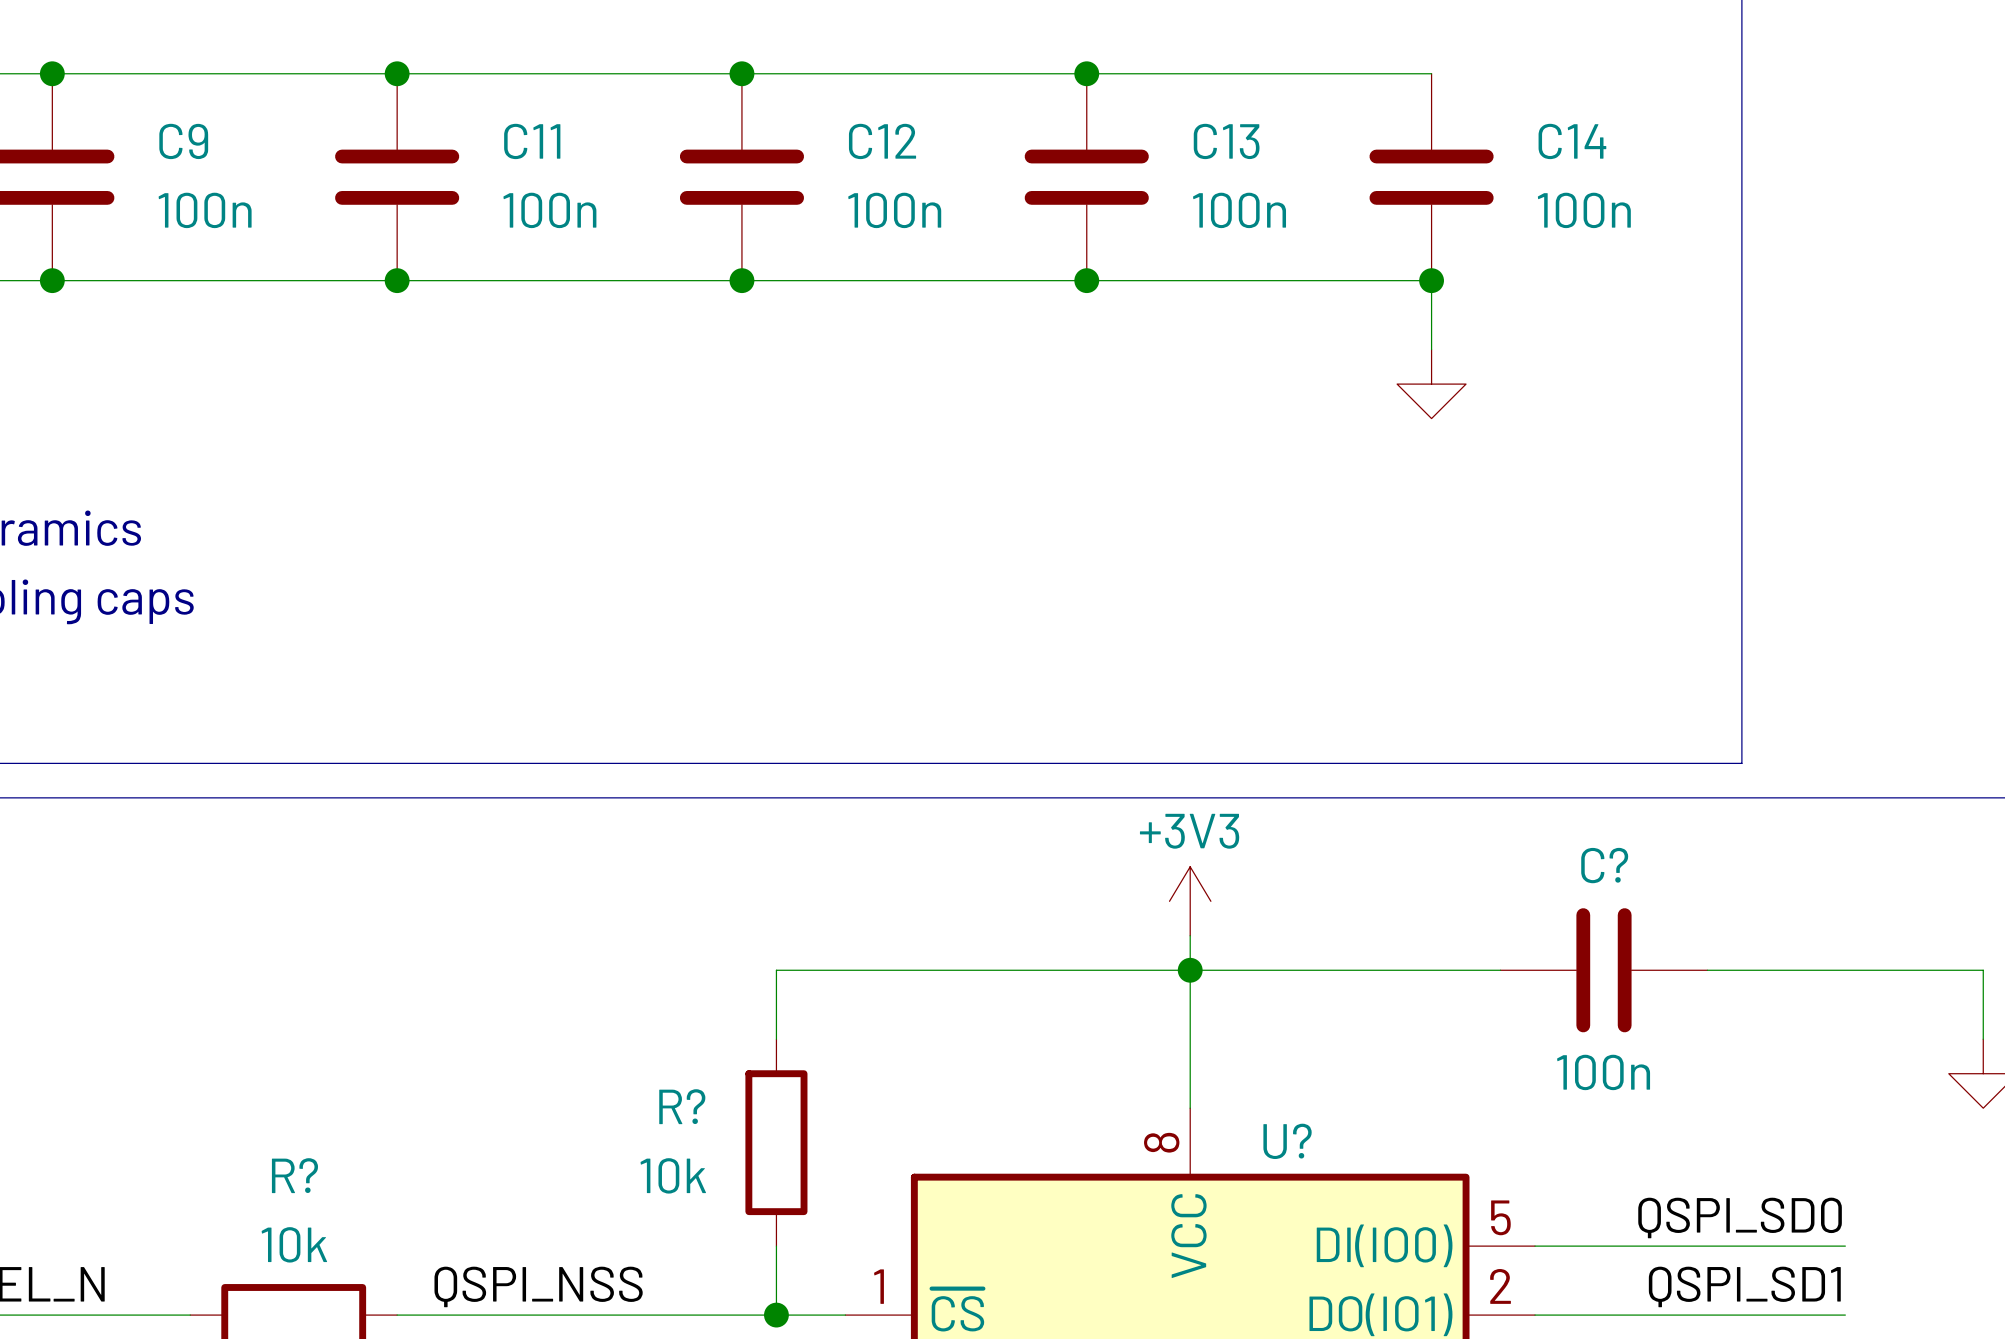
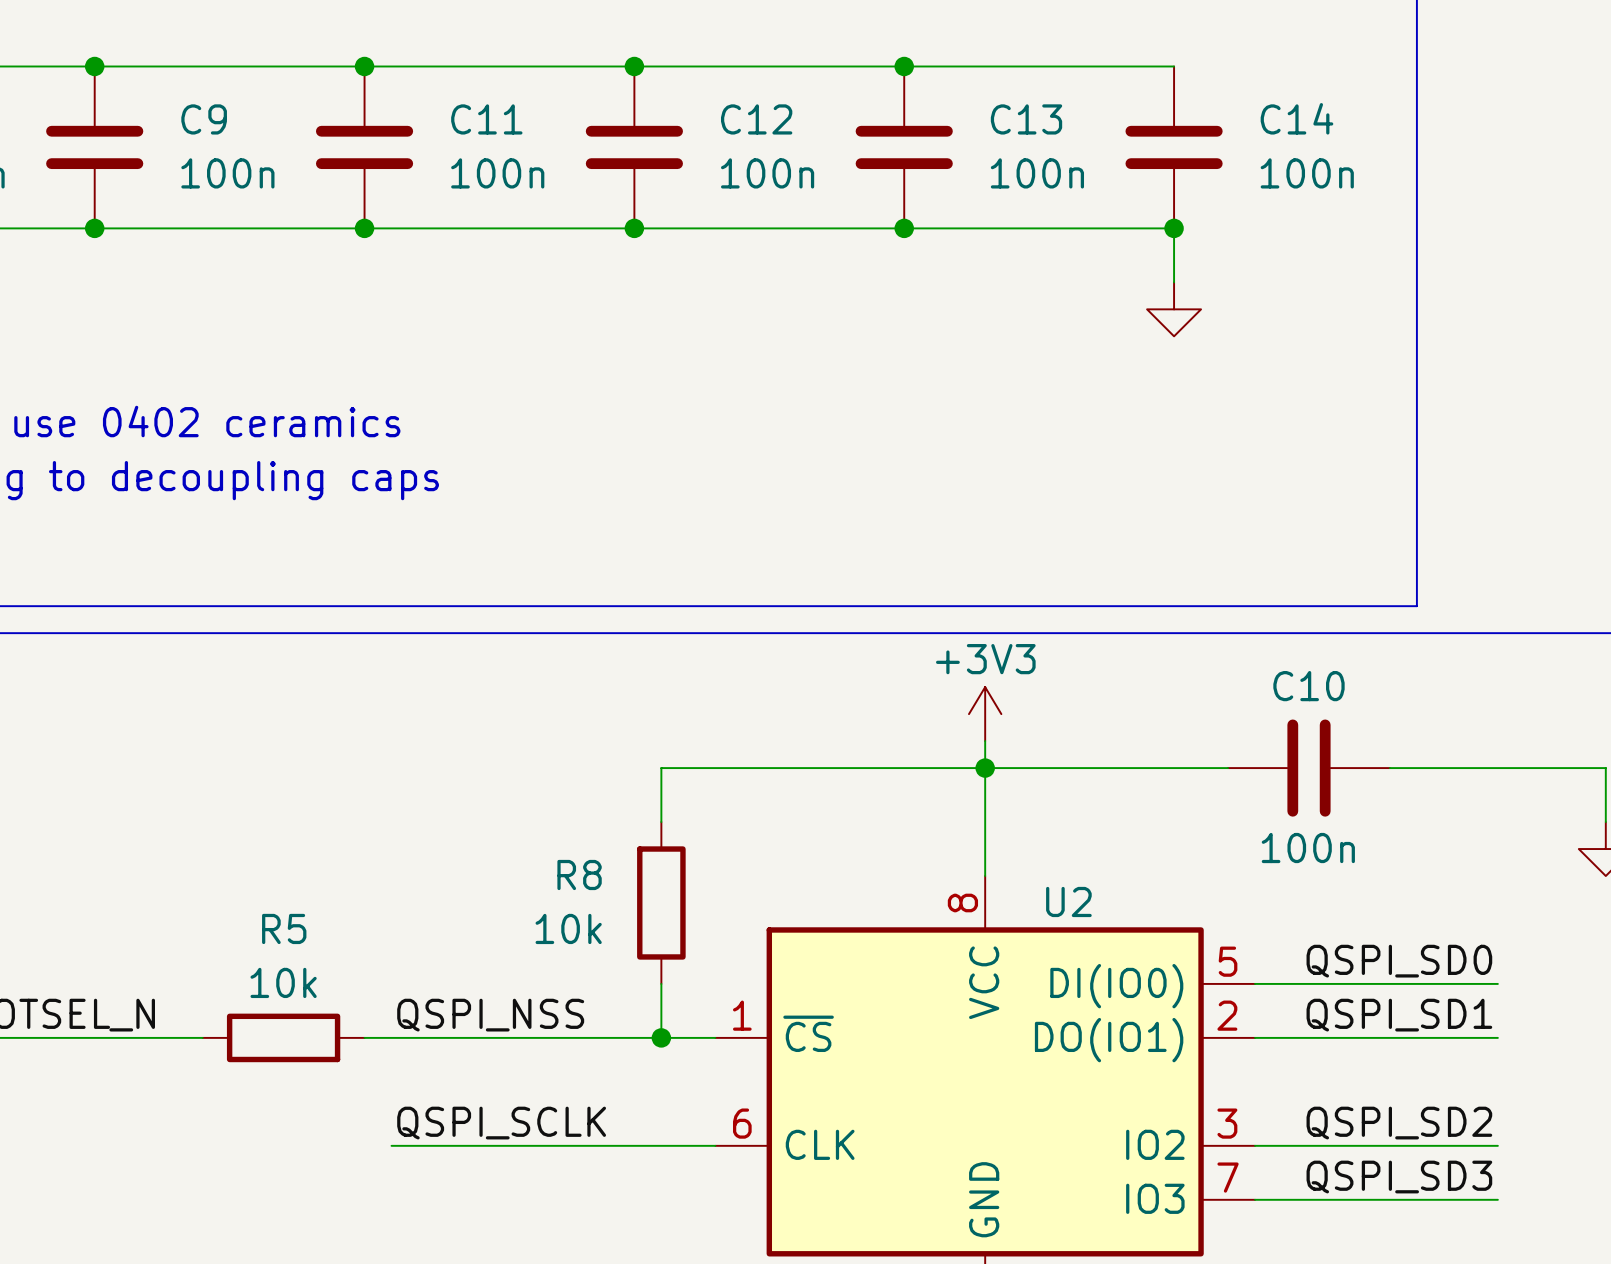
C? name: C? (1604, 865) -> C10 (1308, 686)
R? name: R? (682, 1106) -> R8 (579, 874)
U? name: U? (1287, 1141) -> U2 (1068, 901)
R? name: R? (294, 1175) -> R5 (284, 928)

